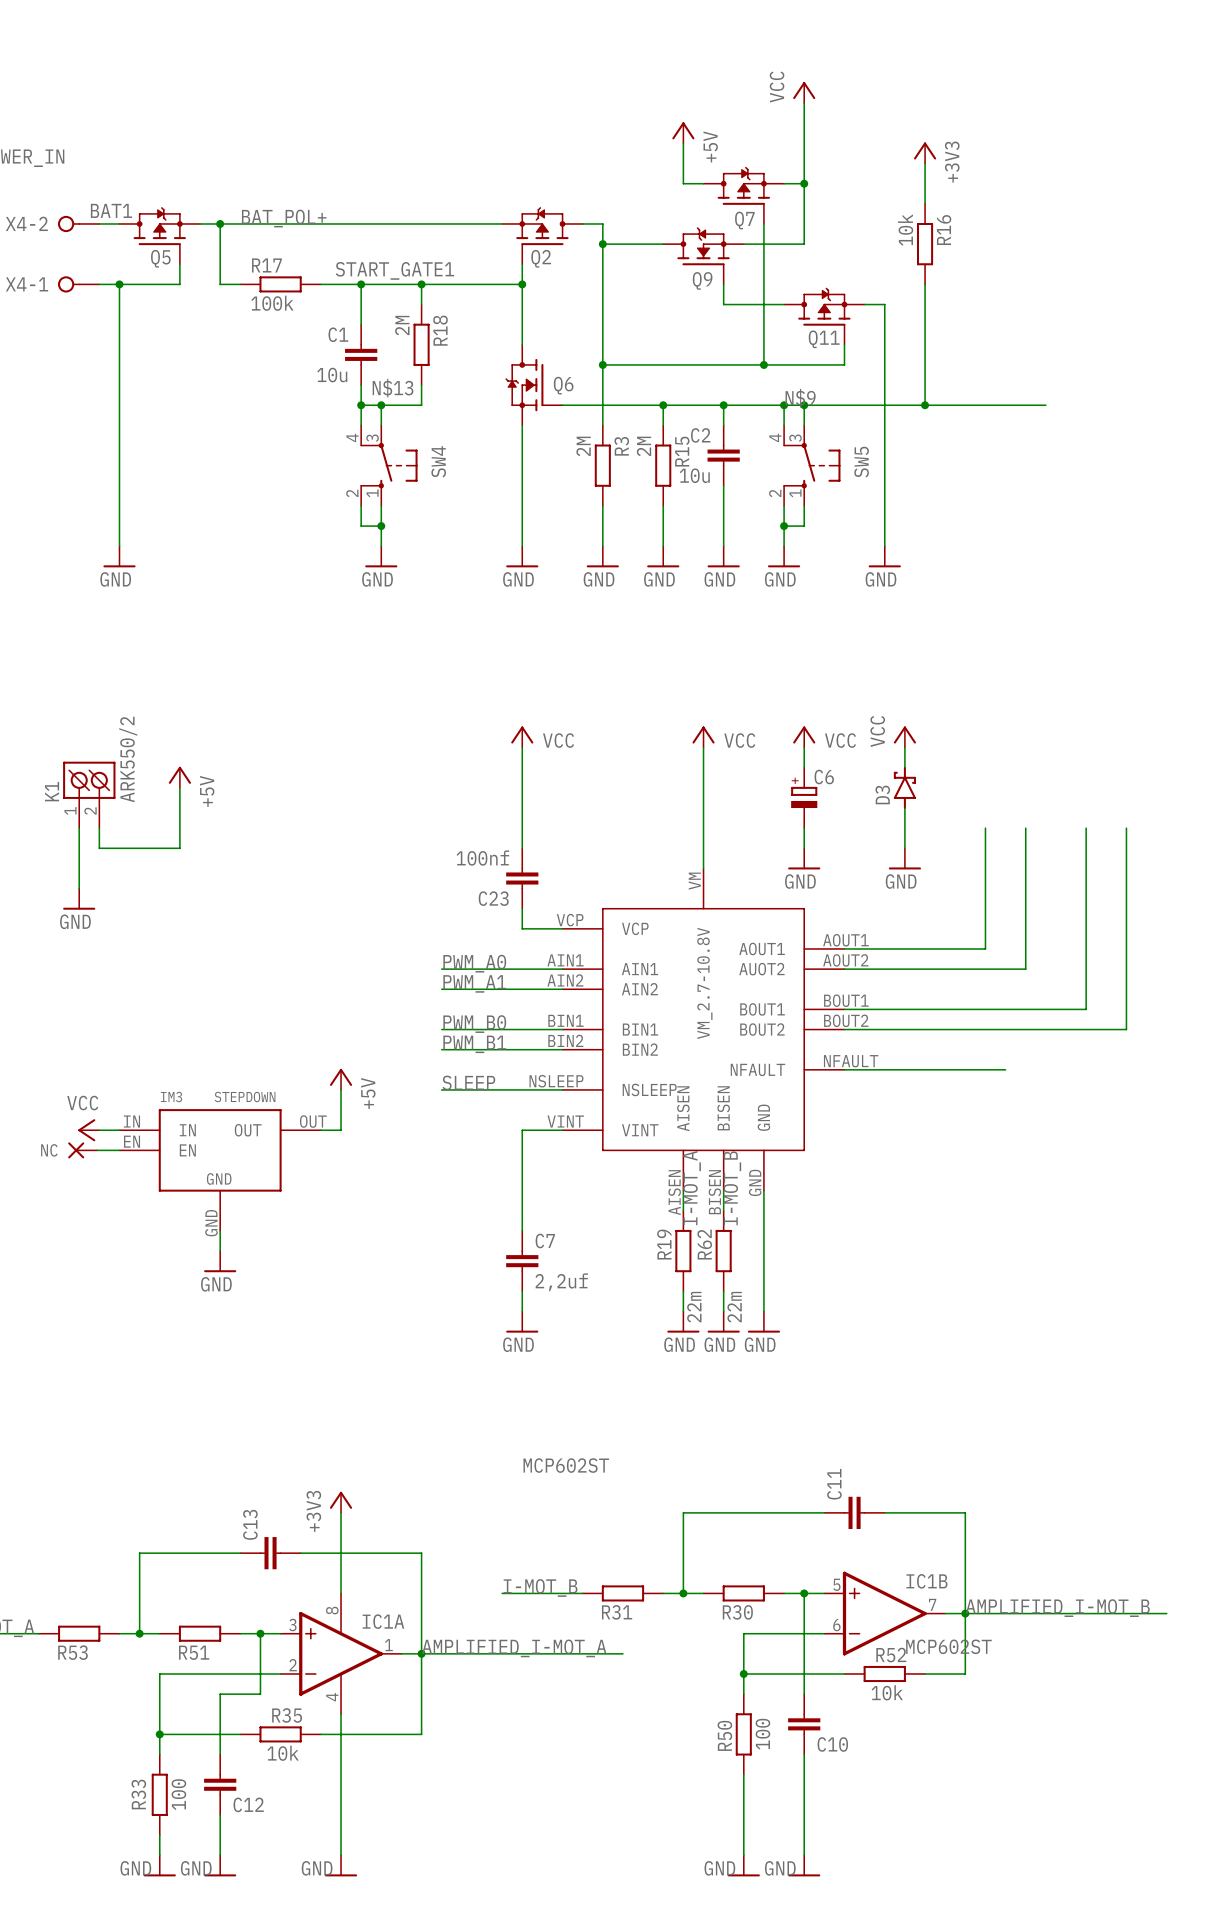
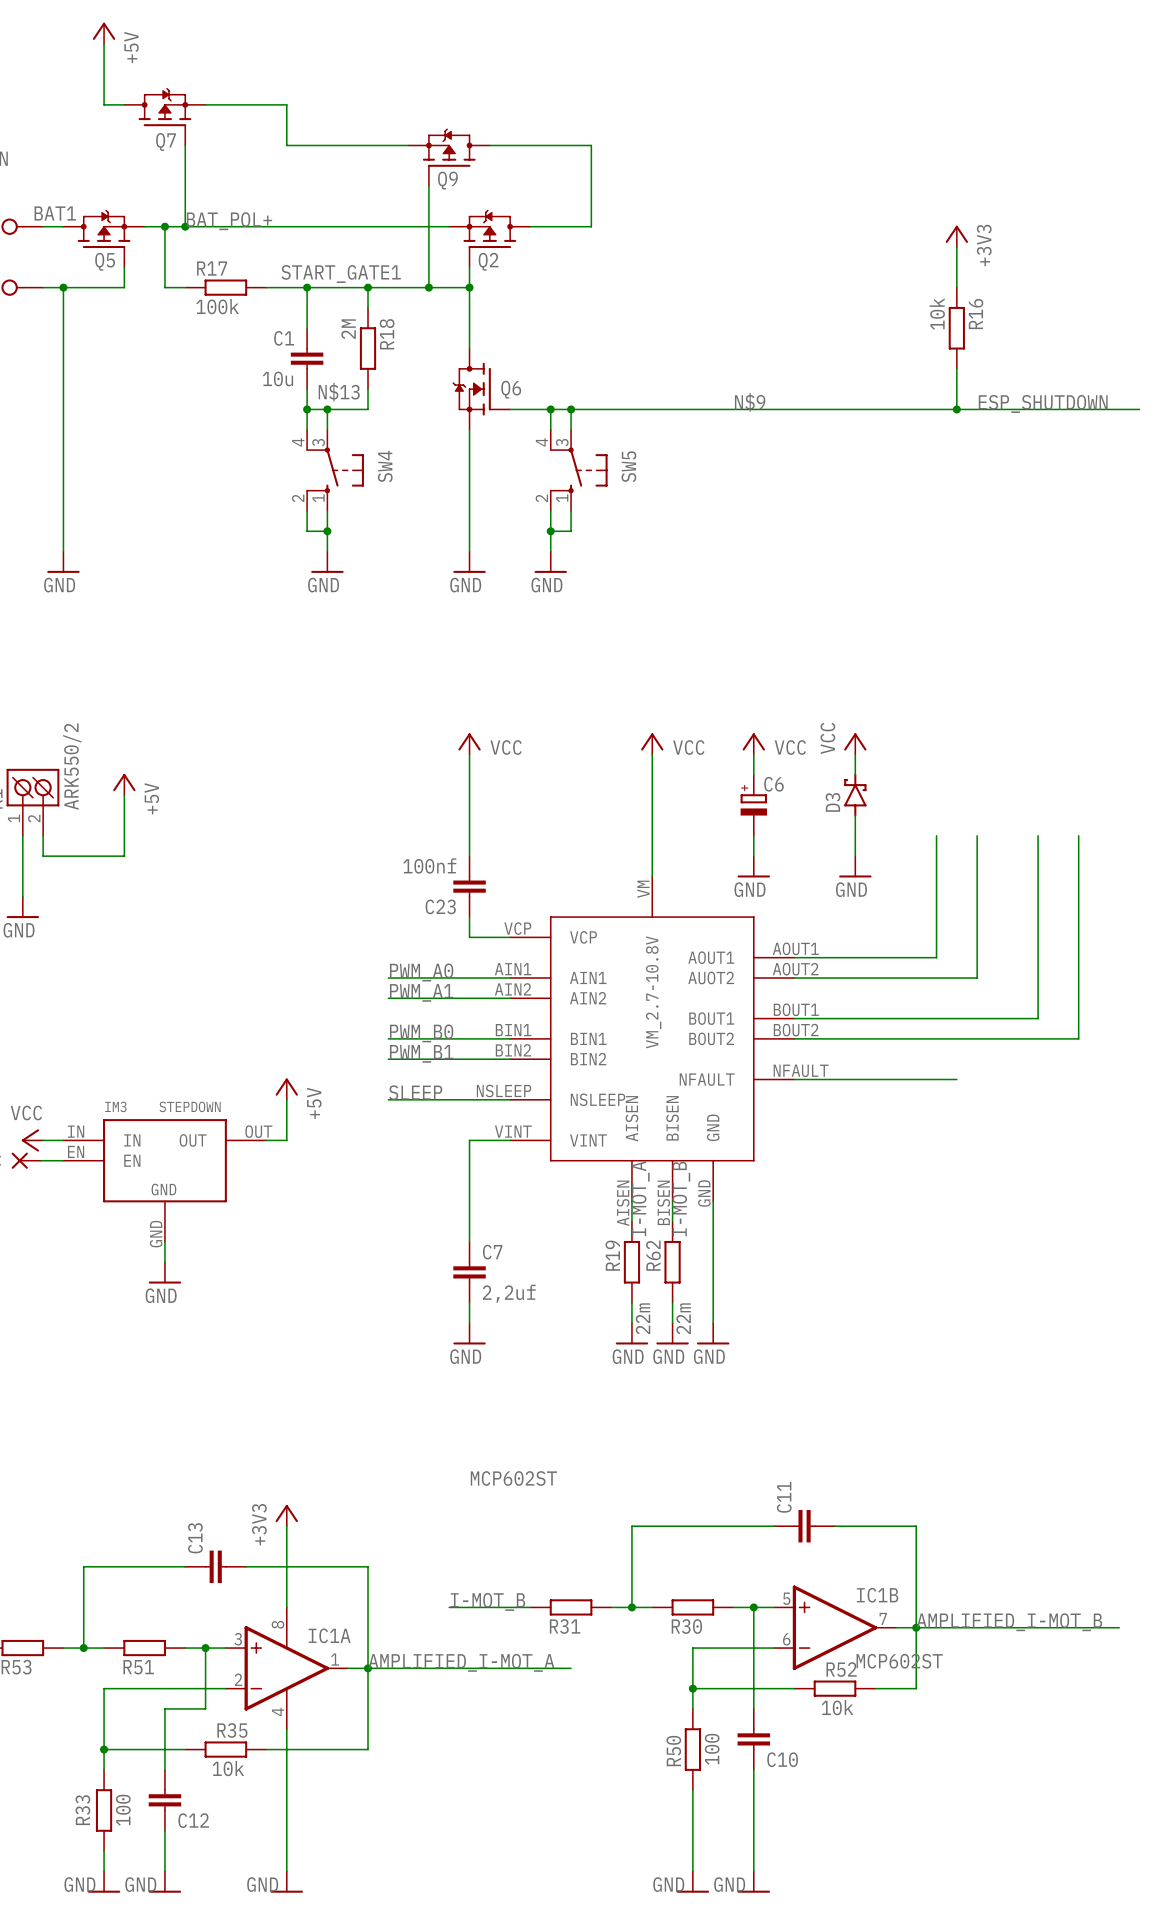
power symbol: none -> +5V (104, 33)
wire: none -> (104, 43) (104, 104) (124, 104)
power symbol: VCC (804, 92) -> none
wire: none -> (205, 104) (286, 104) (286, 145) (408, 145)
wire: (804, 103) (804, 244) (743, 244) -> none
power symbol: +5V (683, 132) -> none
wire: none -> (185, 145) (185, 226)
wire: (683, 143) (683, 183) (703, 183) -> none
power symbol position: +3V3 (925, 153) -> +3V3 (956, 236)
wire: (925, 163) (925, 203) -> (956, 247) (956, 287)
wire: none -> (428, 186) (428, 287)
wire: (784, 183) (804, 183) -> none
junction: (804, 183) -> none
Q7 position: (743, 195) -> (164, 116)
junction: none -> (185, 226)
wire: (602, 223) (602, 405) -> (550, 226) (591, 226) (591, 145) (489, 145)
wire: (763, 223) (763, 364) -> none
Q9 symbol: [663, 227, 744, 285] -> [408, 128, 490, 187]
wire: (602, 244) (663, 244) -> none
junction: (602, 244) -> none
R16 position: (925, 244) -> (956, 328)
junction: none -> (428, 287)
wire: (723, 284) (723, 304) (784, 304) -> none
wire: (925, 284) (925, 405) -> none
wire: (864, 304) (884, 304) (884, 546) -> none
Q11: (824, 316) -> none
wire: (844, 344) (844, 364) (602, 364) -> none
junction: (602, 364) -> none
junction: (763, 364) -> none
wire: none -> (956, 368) (956, 409)
label: none -> ESP_SHUTDOWN (1043, 403)
junction: none -> (550, 409)
junction: none -> (571, 409)
wire: (663, 405) (663, 425) -> none
junction: (663, 405) -> none
wire: (723, 405) (723, 425) -> none
junction: (723, 405) -> none
wire: (784, 405) (784, 425) -> none
junction: (784, 405) -> none
wire: (804, 405) (804, 425) -> (571, 409) (571, 429)
junction: (804, 405) -> none
junction: (925, 405) -> none
junction: none -> (956, 409)
wire: none -> (997, 409) (1139, 409)
C2: 10u (723, 455) -> none
R3: 2M (602, 465) -> none
R15: 2M (663, 465) -> none
SW5 position: (811, 465) -> (578, 470)
wire: (723, 485) (723, 546) -> none
wire: (663, 505) (663, 546) -> none
wire: (784, 505) (784, 546) -> none
wire: (804, 505) (804, 526) (784, 526) -> (571, 510) (571, 531) (550, 531)
junction: none -> (550, 531)
junction: (784, 526) -> none
power symbol: GND (663, 556) -> none
power symbol: GND (723, 556) -> none
power symbol: GND (784, 556) -> none
power symbol: GND (884, 556) -> none

